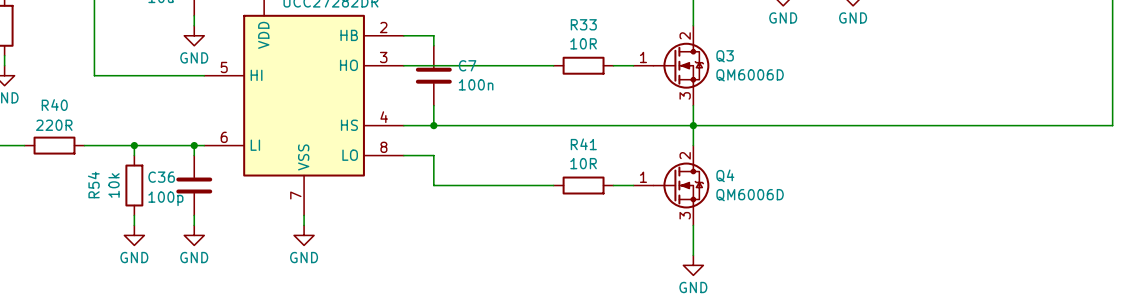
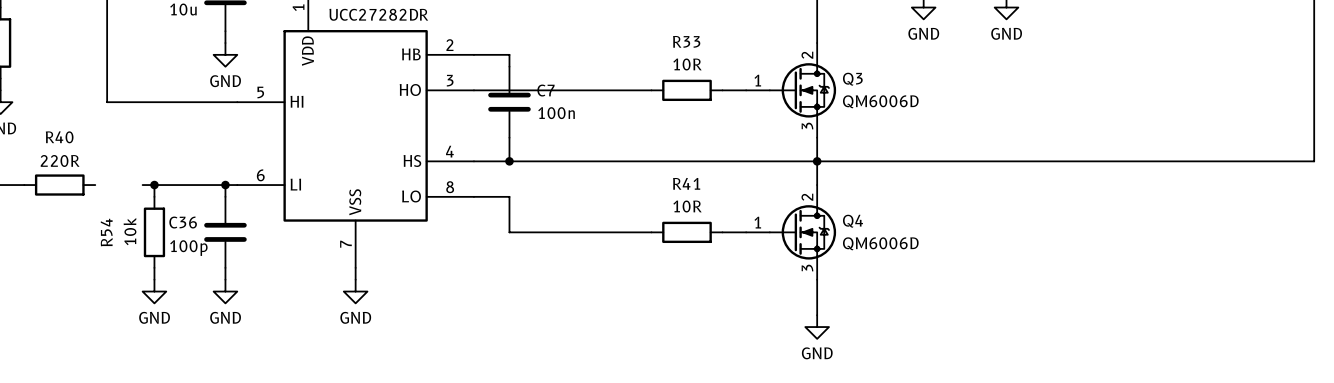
wire: (84, 145) (124, 145) -> none

